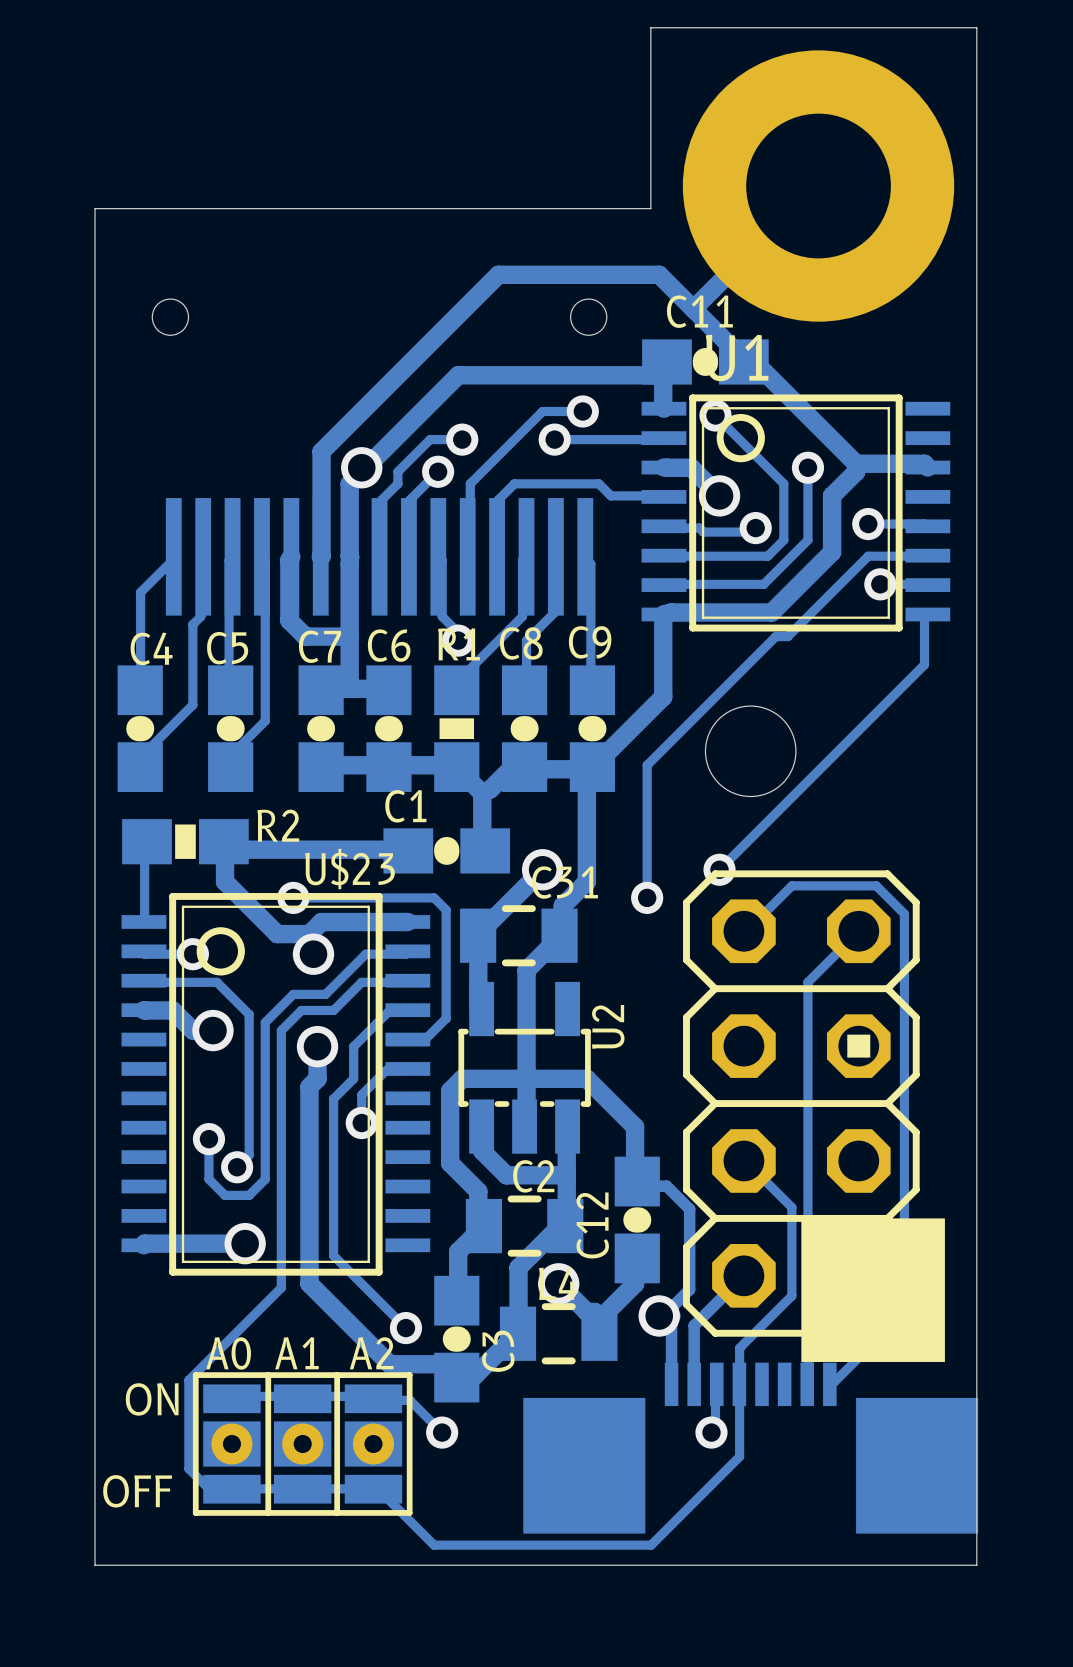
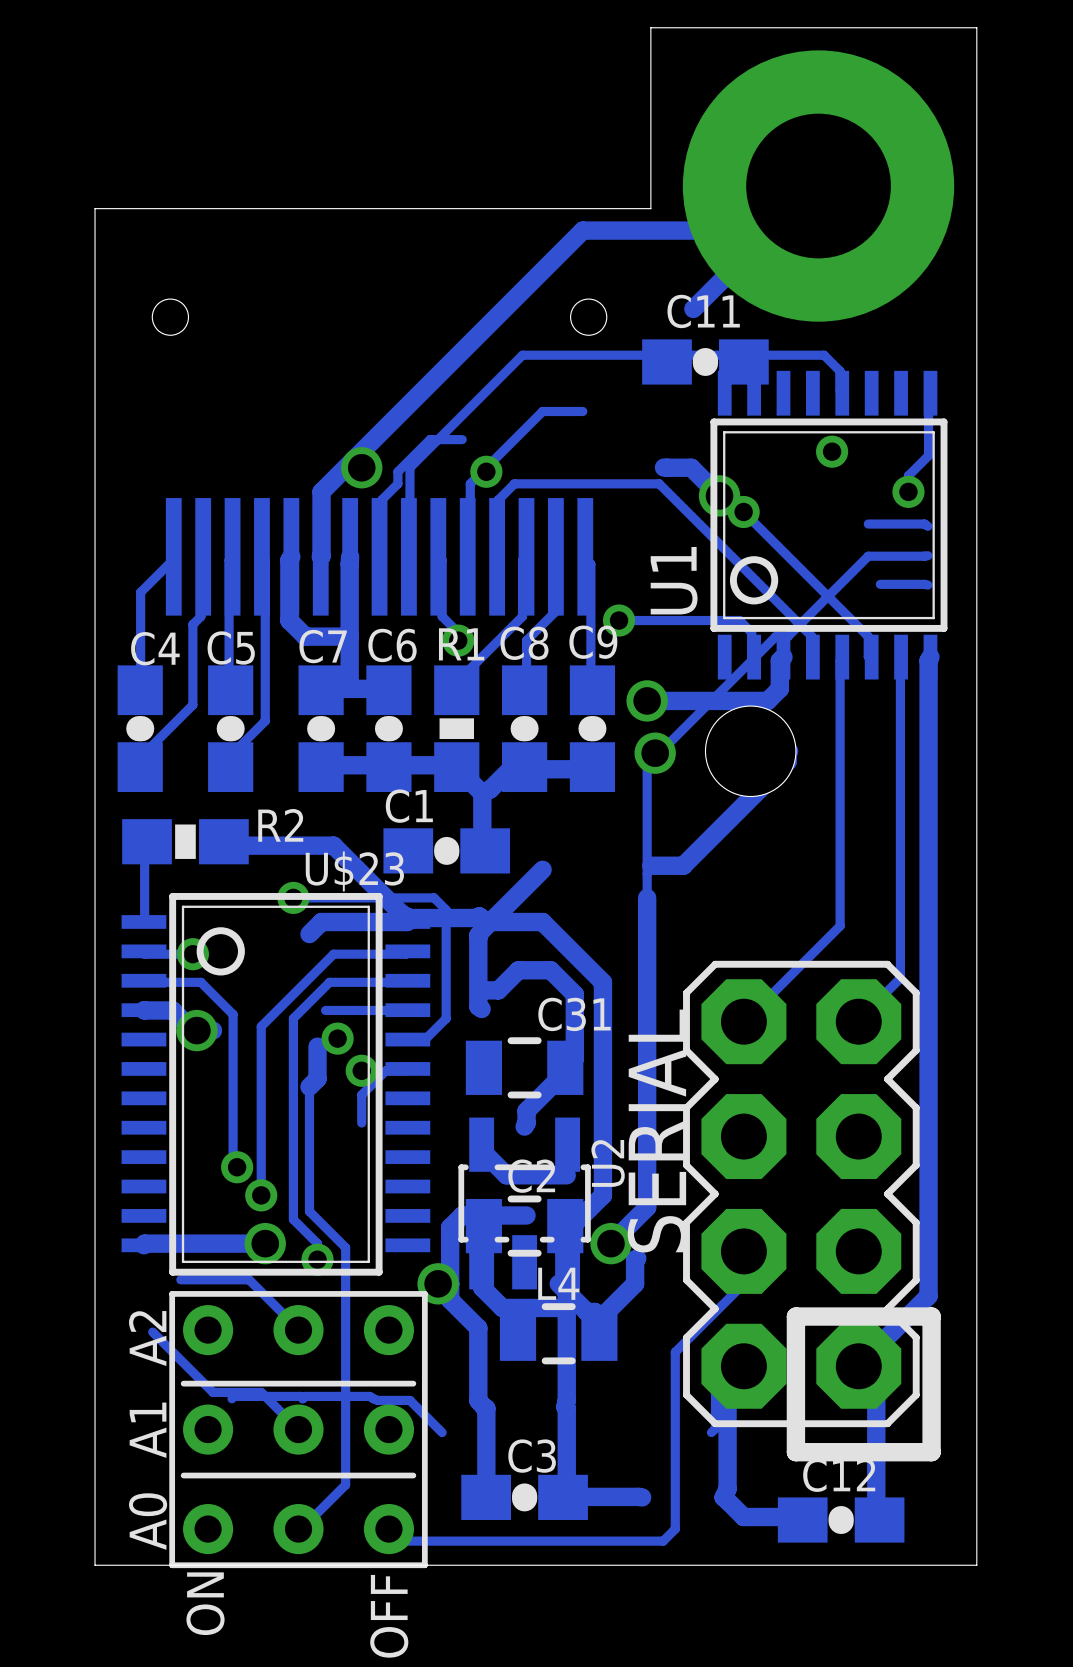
track: none -> (930, 393) (928, 395) (928, 455) (908, 475) (908, 491)
track: (663, 408) (663, 407) (663, 363) (667, 361) (655, 375) (458, 375) (349, 483) (349, 556) -> none
via: (582, 411) -> none
track: (715, 415) (783, 483) (783, 540) (767, 556) (663, 555) -> none
via: (715, 415) -> none
track: (663, 438) (554, 439) -> none
via position: (462, 439) -> (486, 471)
via: (554, 439) -> none
track: (856, 463) (755, 363) (743, 361) (739, 355) (659, 274) (498, 274) (321, 451) (321, 491) -> (771, 230) (582, 230) (321, 491)
track: (856, 463) (856, 471) (832, 495) (832, 552) (771, 612) (671, 612) (663, 614) (663, 696) (586, 773) (586, 881) (562, 905) (562, 934) (526, 970) (526, 1110) -> (479, 993) (482, 990) (498, 990) (518, 970) (550, 970) (574, 994) (574, 1058) (565, 1067) (562, 1074) (526, 1110)
track: (856, 463) (924, 463) (927, 467) -> none
track: (807, 467) (807, 540) (763, 584) (663, 585) -> none
via position: (807, 467) -> (832, 451)
track: (438, 471) (409, 499) -> (842, 393) (840, 391) (840, 371) (824, 355) (522, 355) (409, 467) (409, 499)
via: (438, 471) -> none
track: (598, 483) (610, 495) (663, 496) -> (598, 483) (659, 483) (811, 636) (812, 657)
via: none -> (908, 491)
track: none -> (743, 511) (868, 636) (868, 656) (871, 657)
U1 rotation: 0° (795, 512) -> 90° counterclockwise (828, 525)
via: (868, 524) -> none
track: (663, 526) (667, 528) (699, 528) (703, 532) (751, 532) (755, 528) -> none
via position: (755, 528) -> (743, 511)
via: (880, 584) -> none
track: (927, 614) (924, 616) (924, 664) (719, 869) -> none
track: none -> (619, 620) (739, 620) (751, 632) (751, 656) (754, 657)
via: none -> (619, 620)
track: none -> (783, 657) (779, 660) (779, 688) (767, 700) (647, 700)
track: none -> (842, 657) (840, 660) (840, 926) (743, 1021)
track: none -> (901, 657) (900, 978) (858, 1021)
track: none -> (930, 657) (928, 660) (928, 1295) (858, 1366) (876, 1384) (876, 1517) (879, 1520)
via: none -> (647, 700)
track: none -> (789, 751) (787, 761) (683, 865) (651, 865)
via: none -> (655, 753)
track: (223, 841) (233, 849) (408, 850) -> none
track: (225, 845) (225, 881) (277, 934) (309, 934) (313, 942) (313, 954) -> (225, 845) (333, 845) (401, 913) (409, 918) (478, 918) (479, 916) (486, 922) (542, 922) (602, 982) (602, 1195) (570, 1227) (570, 1255) (566, 1263) (566, 1488) (563, 1497) (642, 1497)
via: (542, 869) -> none
via: (719, 869) -> none
track: none -> (647, 897) (647, 1207) (610, 1243)
via: (647, 897) -> none
track: (743, 931) (747, 930) (791, 885) (876, 885) (904, 913) (904, 1316) (896, 1324) (892, 1324) (832, 1384) (829, 1384) -> none
track: (858, 931) (807, 982) (807, 1384) -> none
C31 position: (518, 935) -> (524, 1067)
via: (313, 954) -> none
track: (365, 954) (325, 994) (293, 994) -> (365, 954) (333, 954) (293, 994)
track: (200, 982) (217, 982) (249, 1014) (249, 1155) (237, 1167) -> (200, 982) (233, 1014) (233, 1167)
track: (361, 982) (333, 1010) -> (361, 982) (329, 982) (301, 1010)
track: (325, 1010) (301, 1010) -> none
track: (389, 1010) (353, 1046) (353, 1078) (333, 1098) (333, 1255) (405, 1328) -> (389, 1010) (333, 1010)
track: (293, 1018) (281, 1030) (281, 1287) (188, 1380) (188, 1468) (208, 1488) (377, 1488) (434, 1545) (651, 1545) (739, 1456) (739, 1348) (791, 1295) (791, 1207) (743, 1160) -> (293, 1018) (293, 1219) (317, 1243) (317, 1259)
track: (265, 1022) (265, 1179) (249, 1195) (225, 1195) (208, 1179) (208, 1139) -> (265, 1022) (261, 1026) (261, 1195)
via position: (212, 1030) -> (196, 1030)
via position: (317, 1046) -> (337, 1038)
U2 position: (524, 1067) -> (524, 1203)
via: none -> (361, 1070)
track width: thick (309, 1086) (309, 1211) -> thin (309, 1086) (309, 1211)
part: (813, 1116) -> none
via: (361, 1123) -> none
track: (567, 1126) (566, 1223) (565, 1226) (558, 1227) (518, 1267) (518, 1333) (474, 1376) (456, 1377) (442, 1364) (389, 1364) (309, 1283) (309, 1211) -> (298, 1529) (301, 1529) (345, 1484) (345, 1247) (309, 1211)
via: (208, 1139) -> none
SERIAL: none -> (801, 1193)
via: none -> (261, 1195)
track: none -> (526, 1215) (462, 1215) (450, 1227) (450, 1299) (478, 1328) (478, 1400) (486, 1408) (486, 1496)
C12 rotation: 0° (637, 1219) -> 90° clockwise (841, 1520)
C12 position: (637, 1219) -> (841, 1520)
via position: (245, 1243) -> (265, 1243)
via: none -> (610, 1243)
track: none -> (743, 1251) (743, 1283) (675, 1352) (675, 1529) (663, 1541) (397, 1541) (389, 1533) (388, 1529)
via: none -> (317, 1259)
track: none -> (481, 1262) (482, 1287) (502, 1307) (566, 1307)
track: (743, 1275) (694, 1325) (694, 1384) -> none
track: none -> (180, 1279) (249, 1279) (298, 1330)
via: none -> (438, 1283)
via: (558, 1283) -> none
track: (456, 1300) (458, 1251) (483, 1226) (478, 1219) (478, 1191) (450, 1163) (450, 1090) (462, 1078) (586, 1078) (635, 1127) (635, 1179) (641, 1186) (666, 1186) (689, 1209) (689, 1289) (671, 1307) (671, 1384) -> none
via: (659, 1316) -> none
line: none -> (931, 1316) (795, 1316) (795, 1452) (931, 1452) (931, 1316)
via: (405, 1328) -> none
track: none -> (152, 1332) (212, 1392) (261, 1392) (298, 1429)
C3 rotation: 0° (456, 1339) -> 90° clockwise (524, 1497)
C3 position: (456, 1339) -> (524, 1497)
track: none -> (743, 1366) (727, 1384) (727, 1488) (723, 1497) (743, 1517) (799, 1517) (802, 1520)
part footprint: [192, 1372, 413, 1516] -> [169, 1291, 428, 1569]
via: (442, 1432) -> none
via: (711, 1432) -> none
part: (750, 1448) -> none

